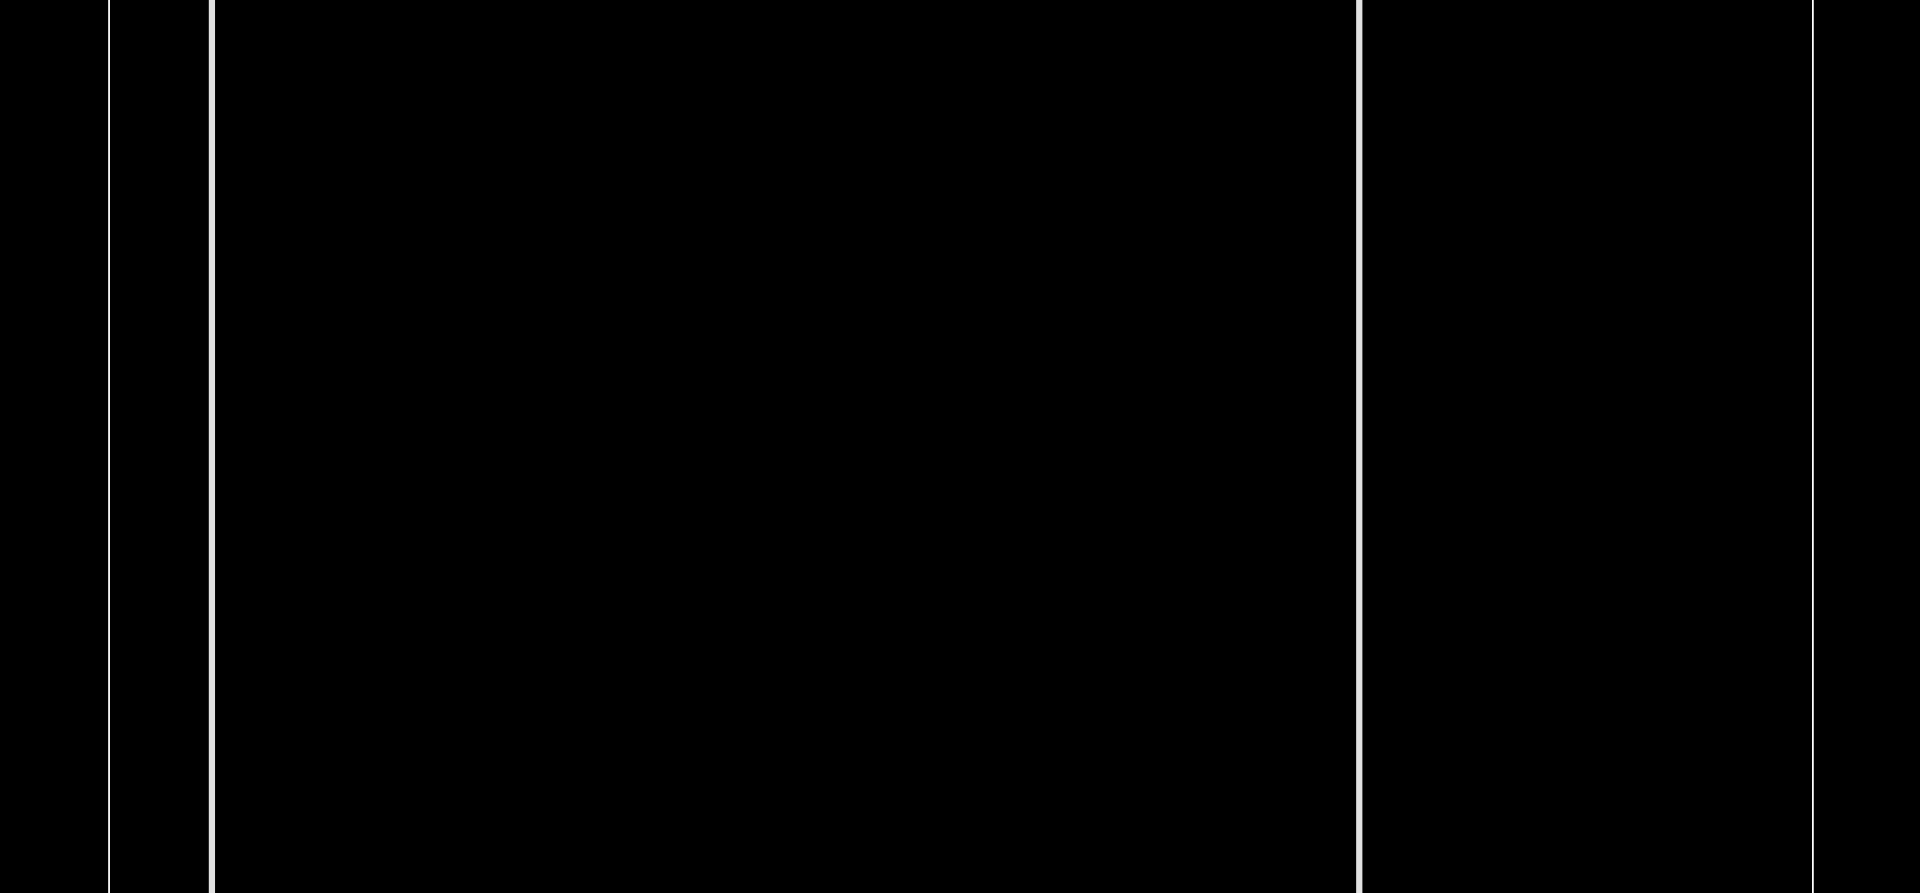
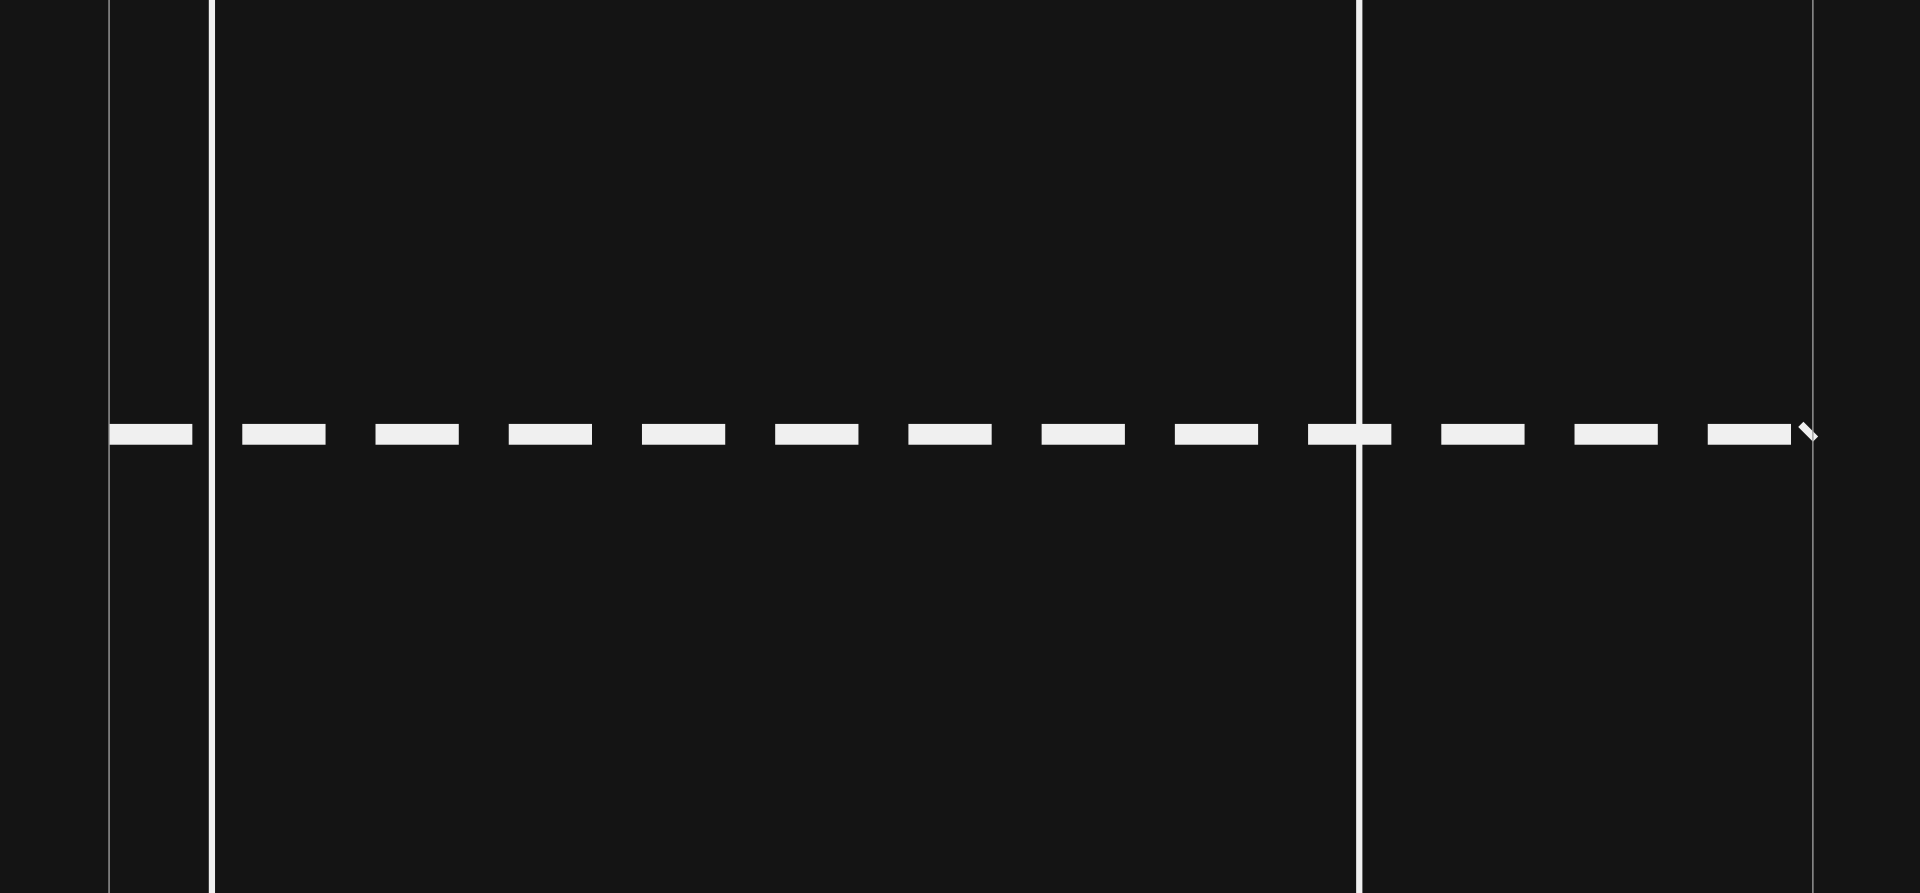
line: none -> (1810, 429) (1805, 434) (109, 434)

